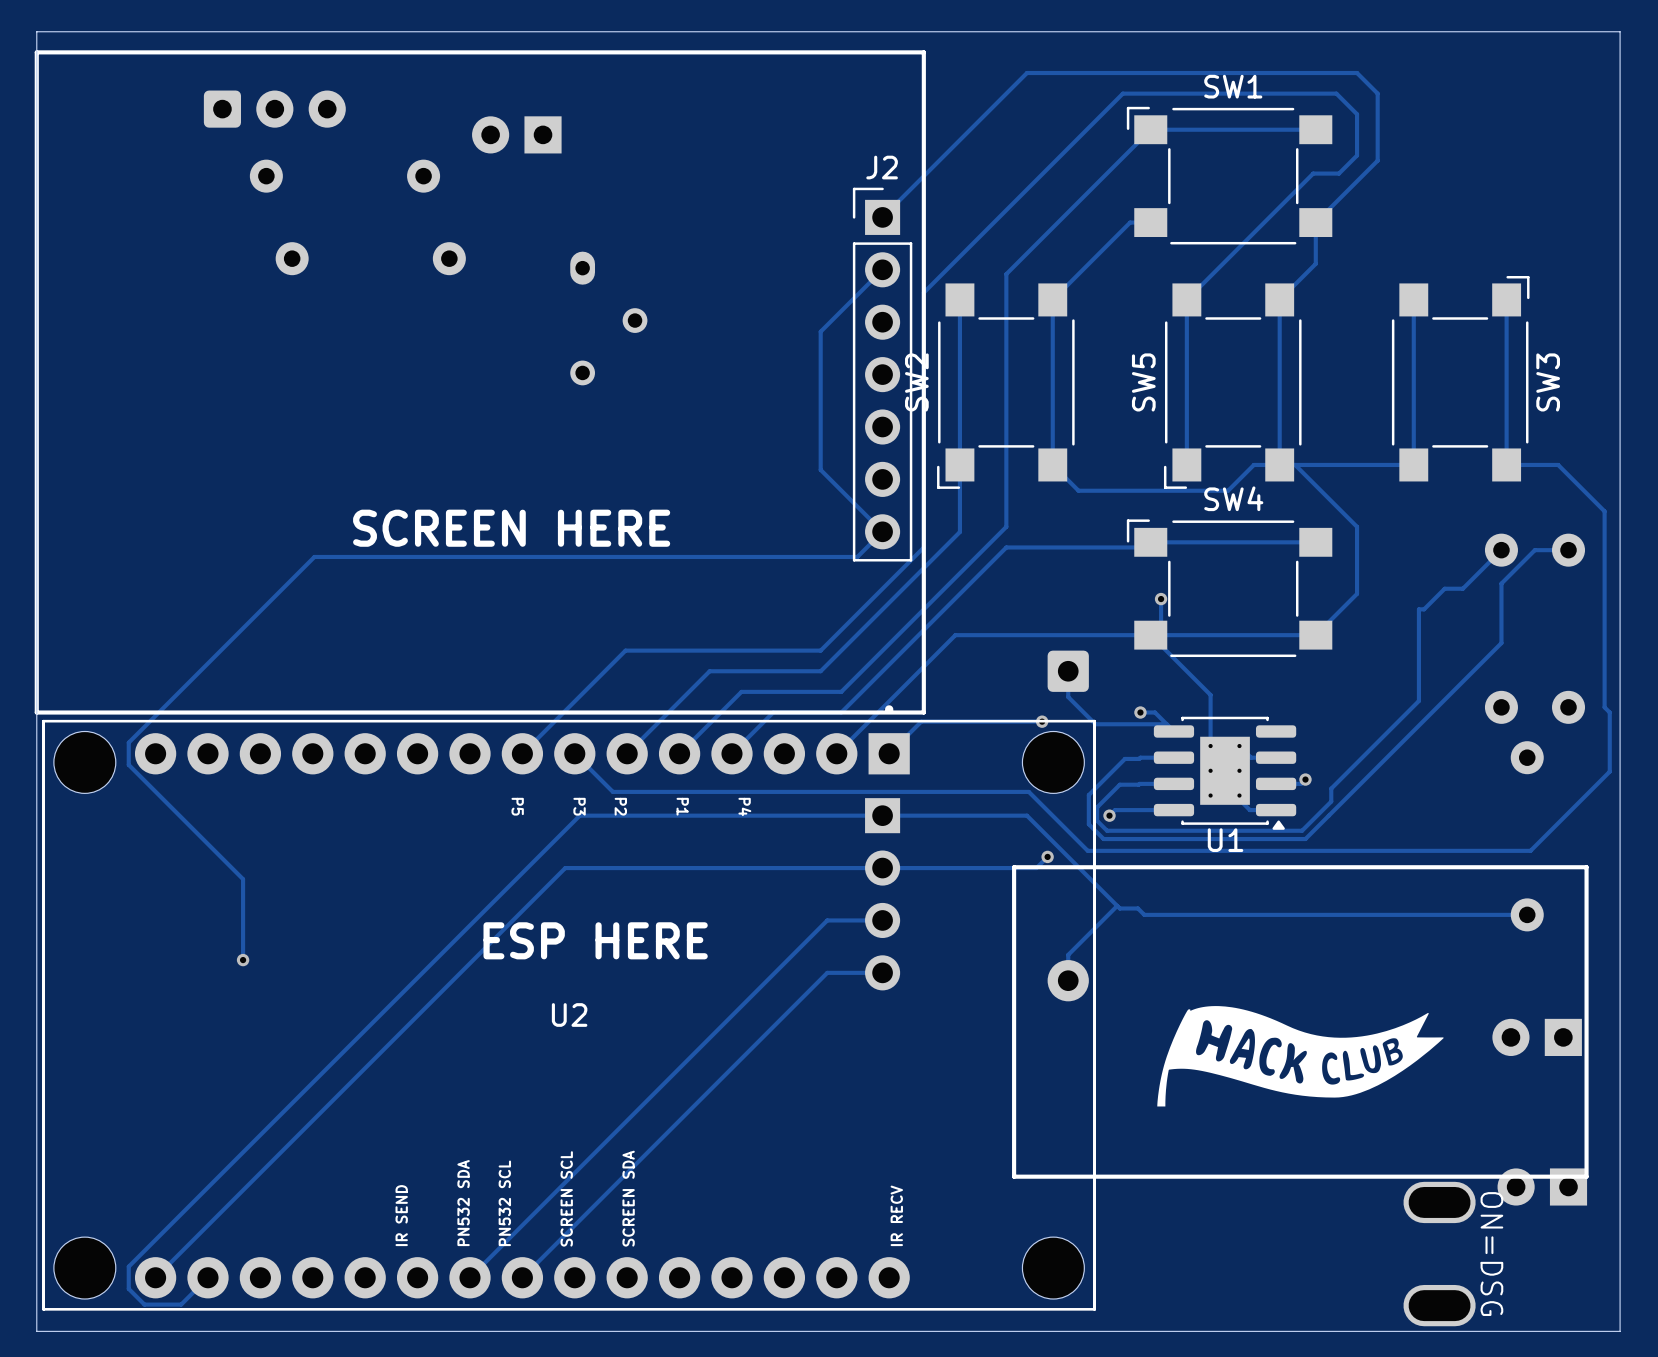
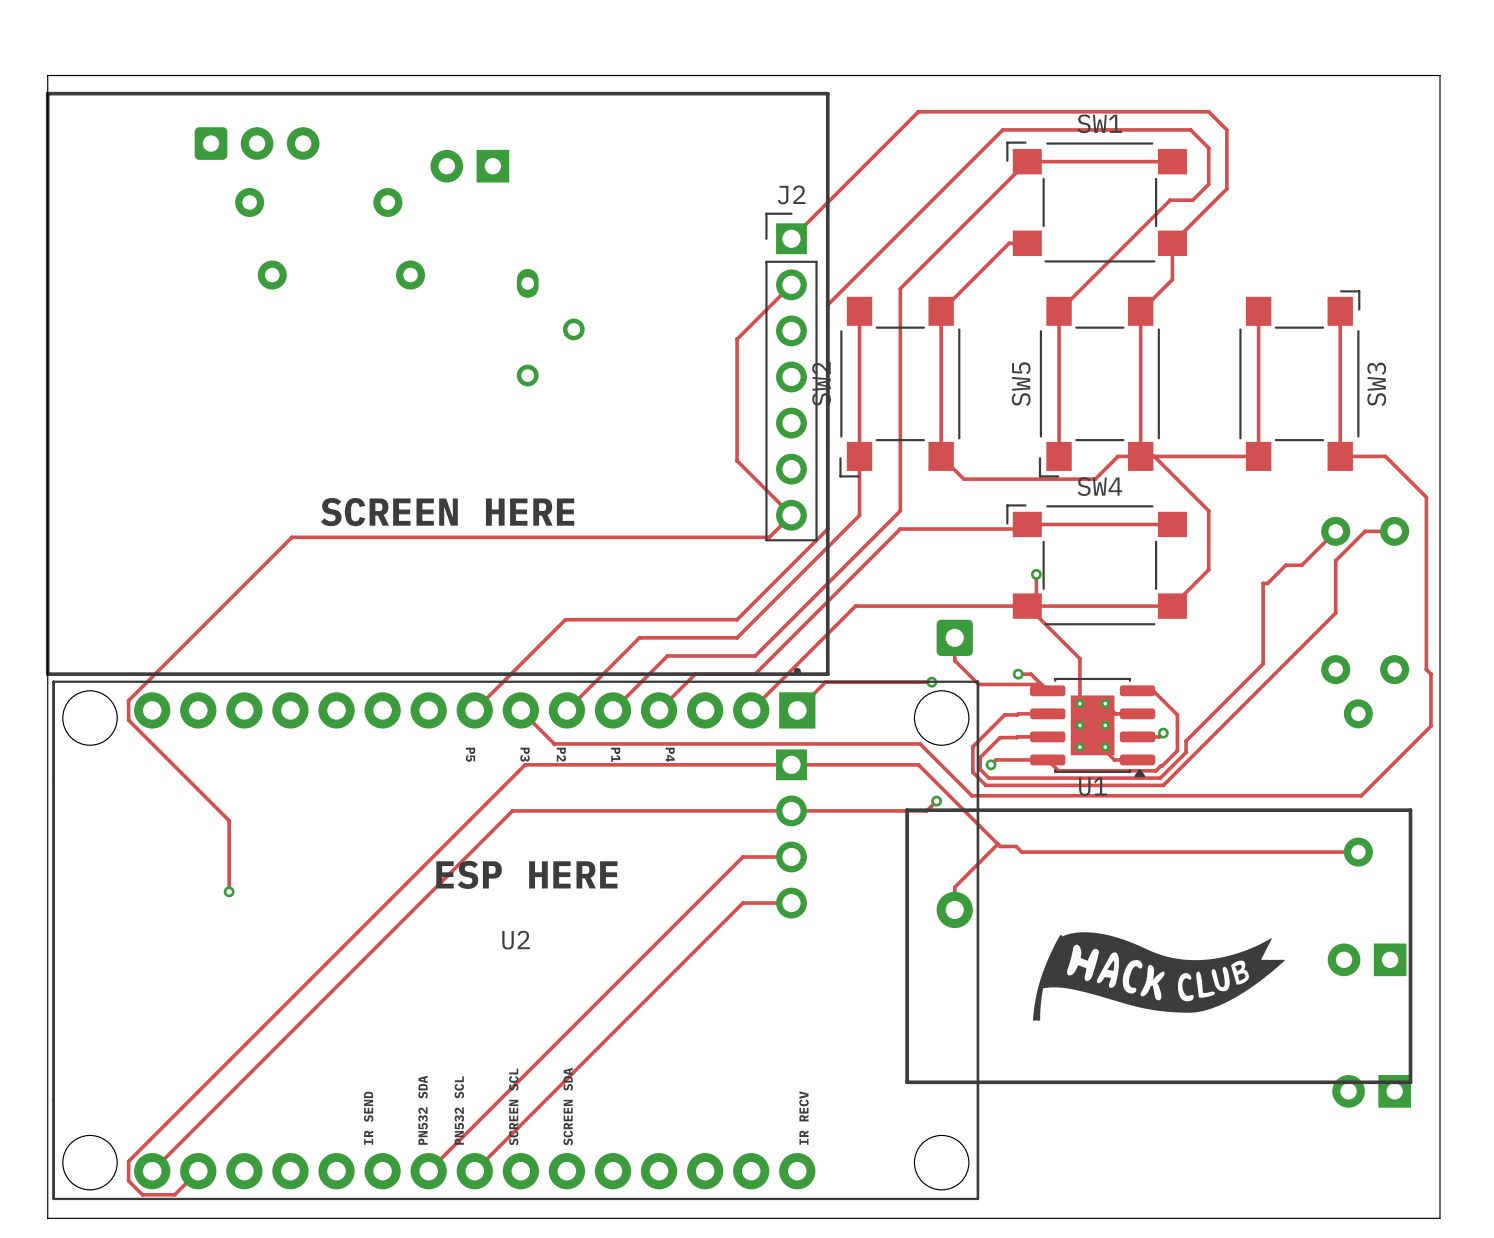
track: none -> (1153, 690) (1177, 714) (1177, 750) (1155, 770) (1058, 770) (1047, 759)
ON=DSG: (1439, 1254) -> none

